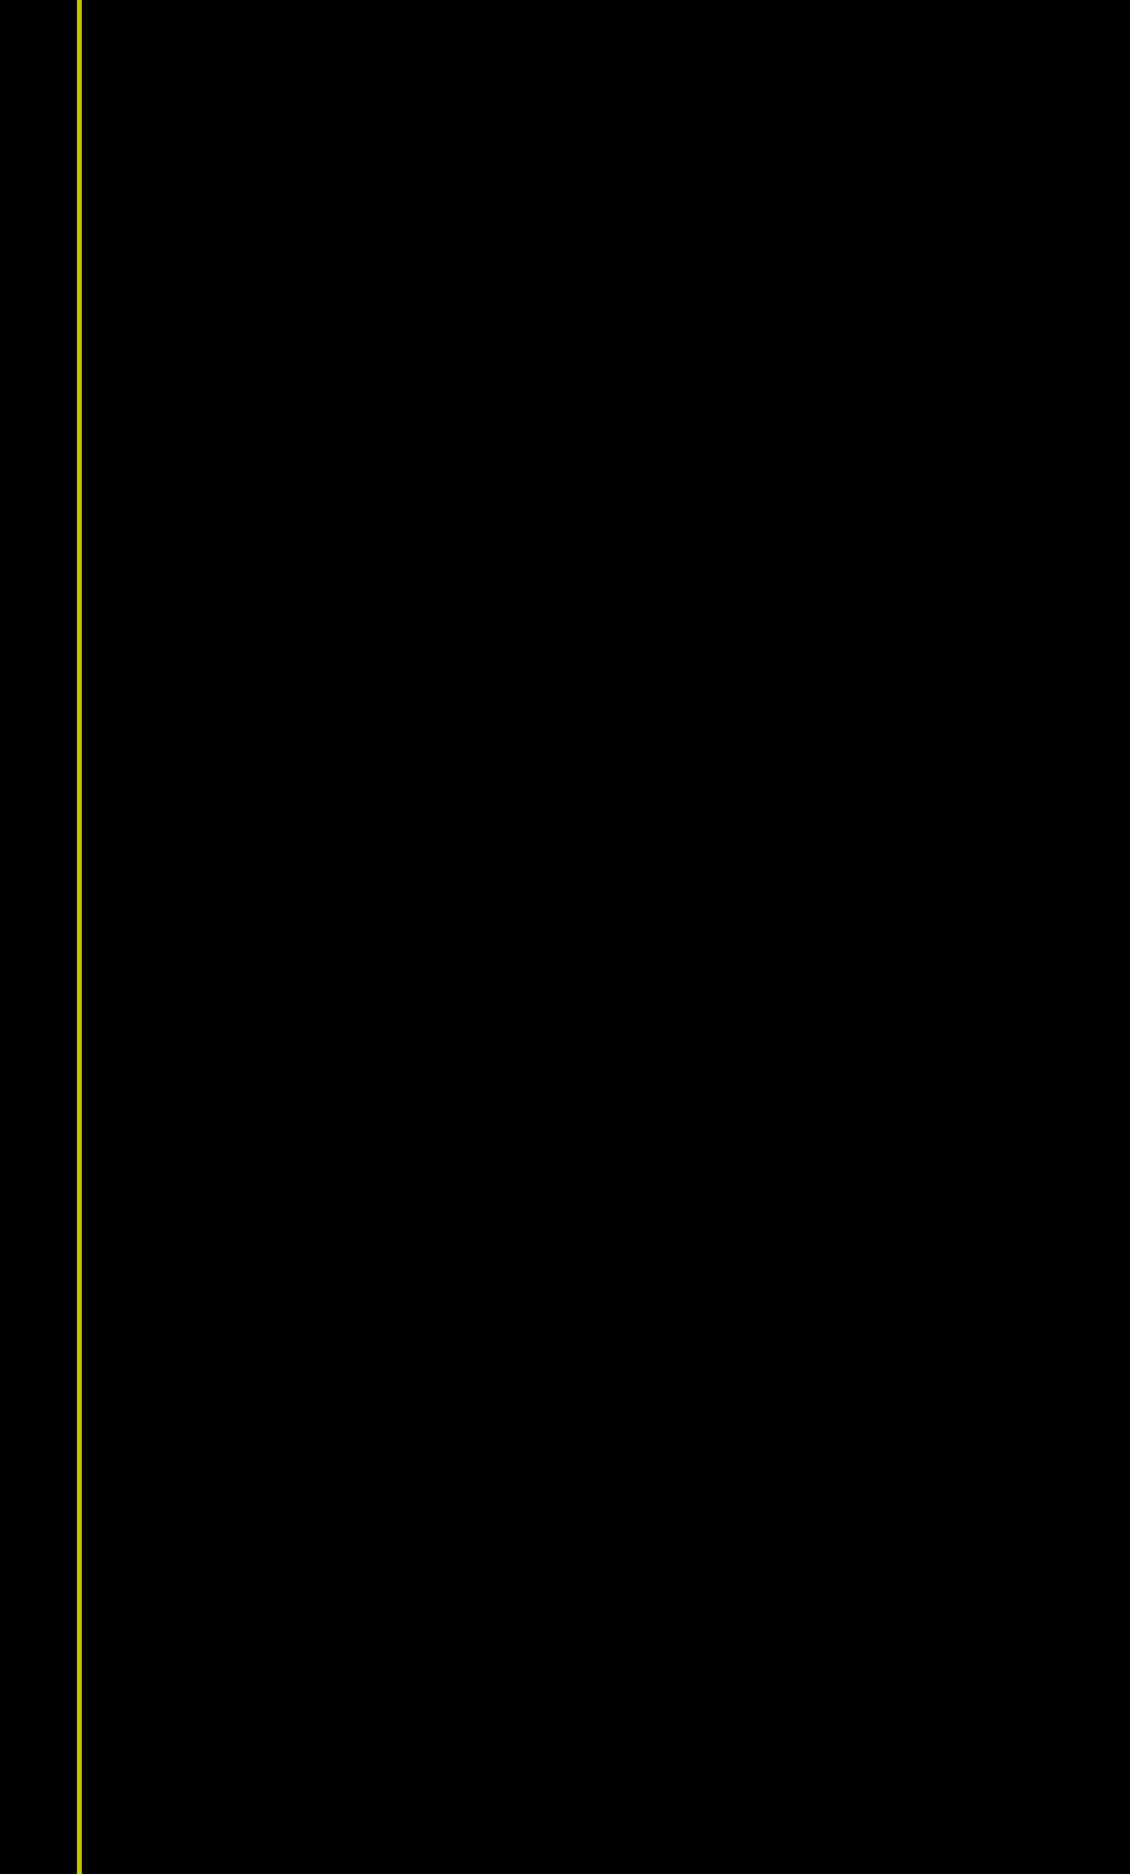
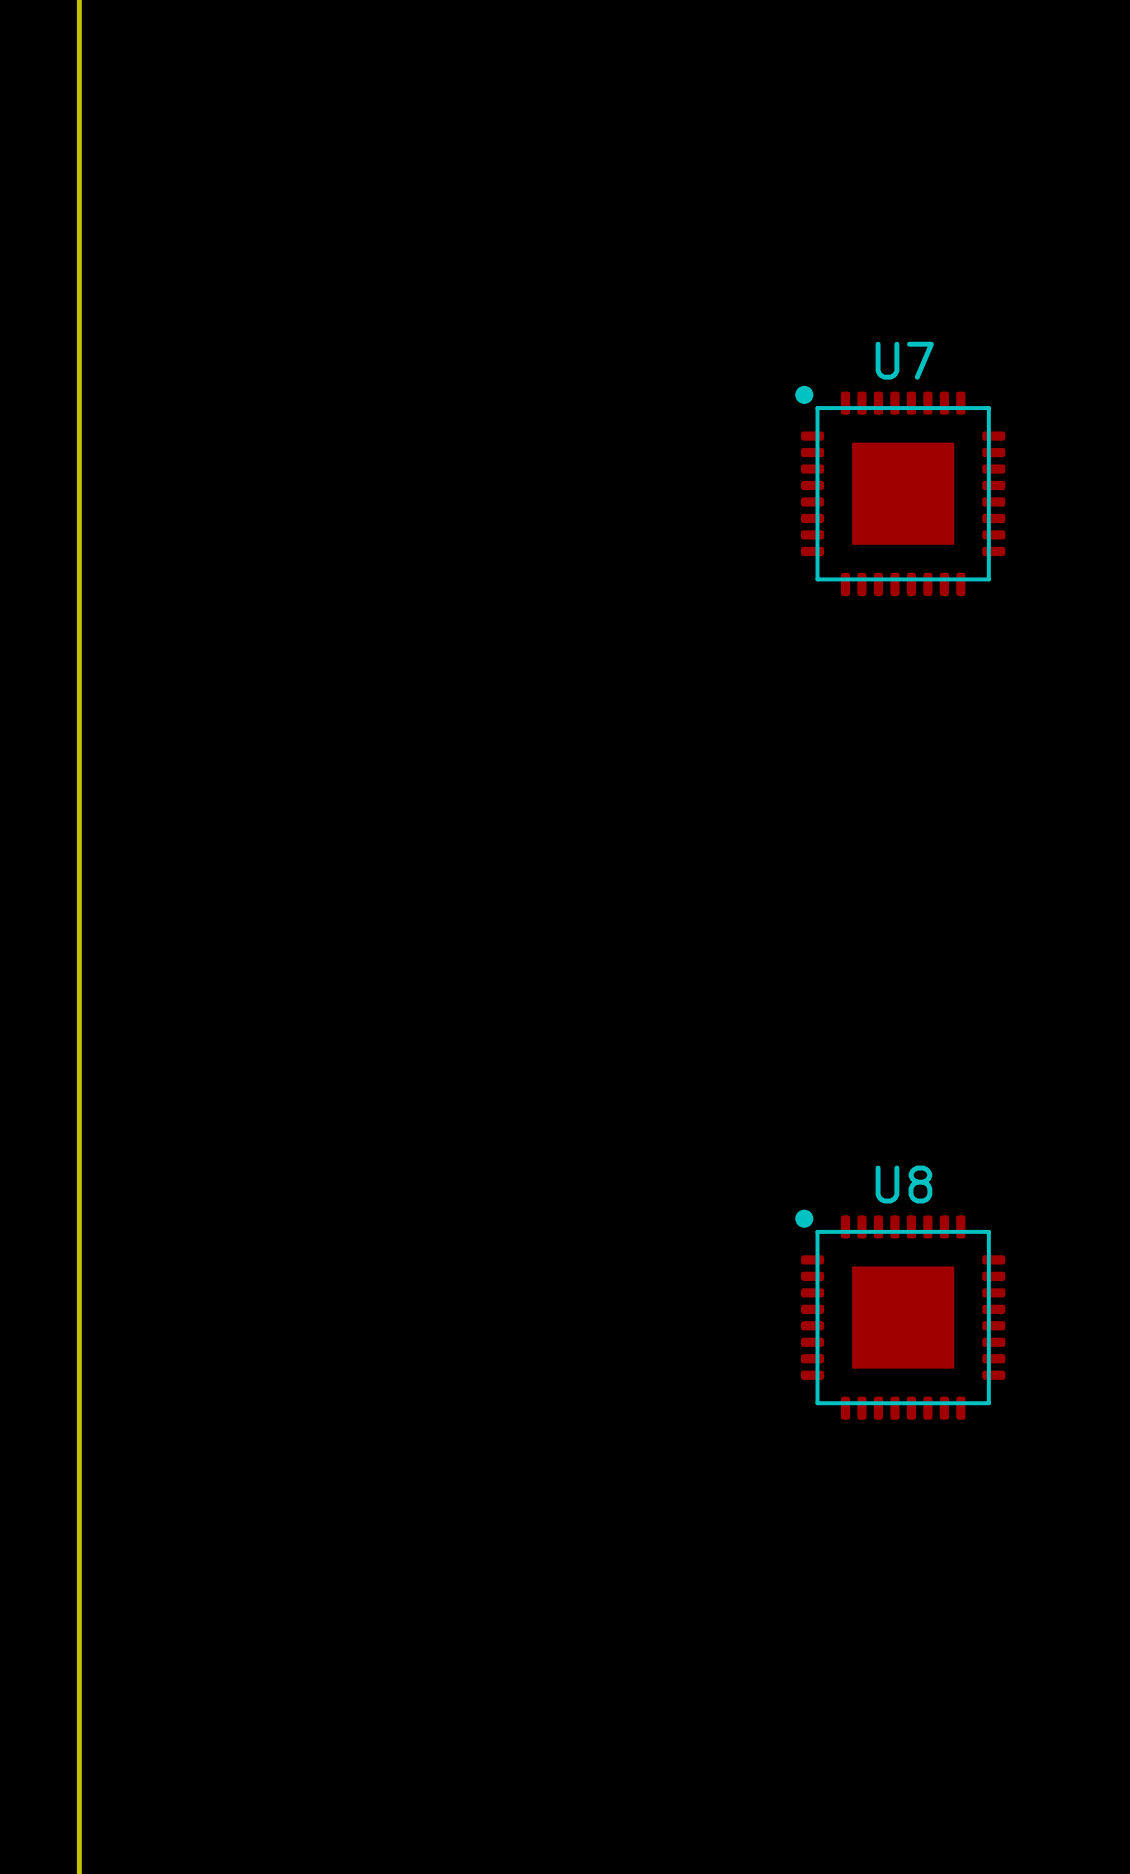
U7: none -> (900, 490)
U8: none -> (900, 1314)

